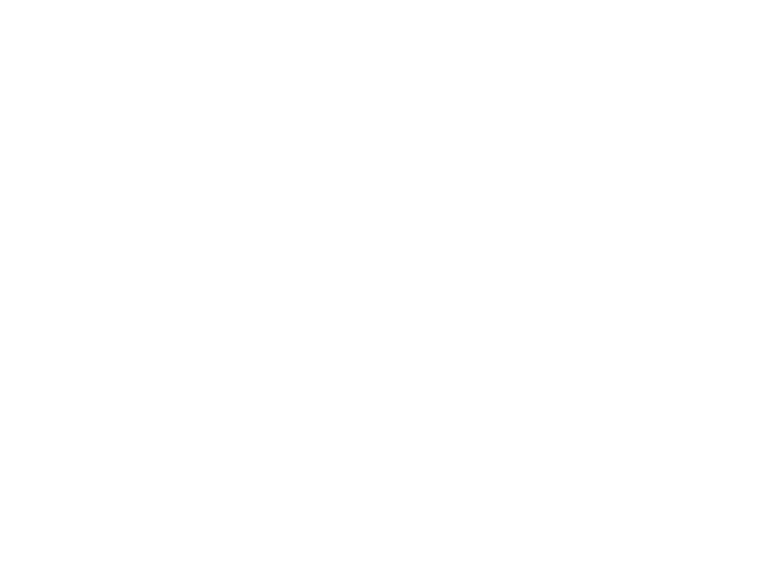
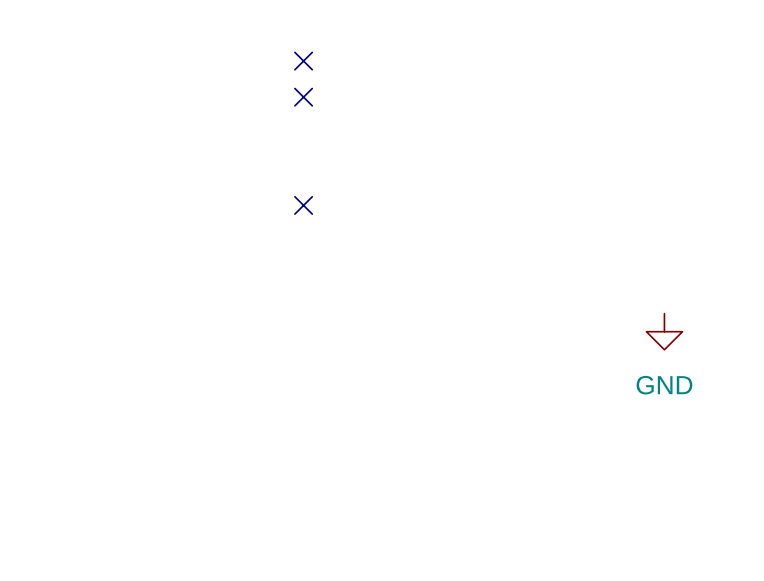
no-connect mark: none -> (303, 61)
no-connect mark: none -> (303, 97)
no-connect mark: none -> (303, 205)
power symbol: none -> GND (664, 331)

